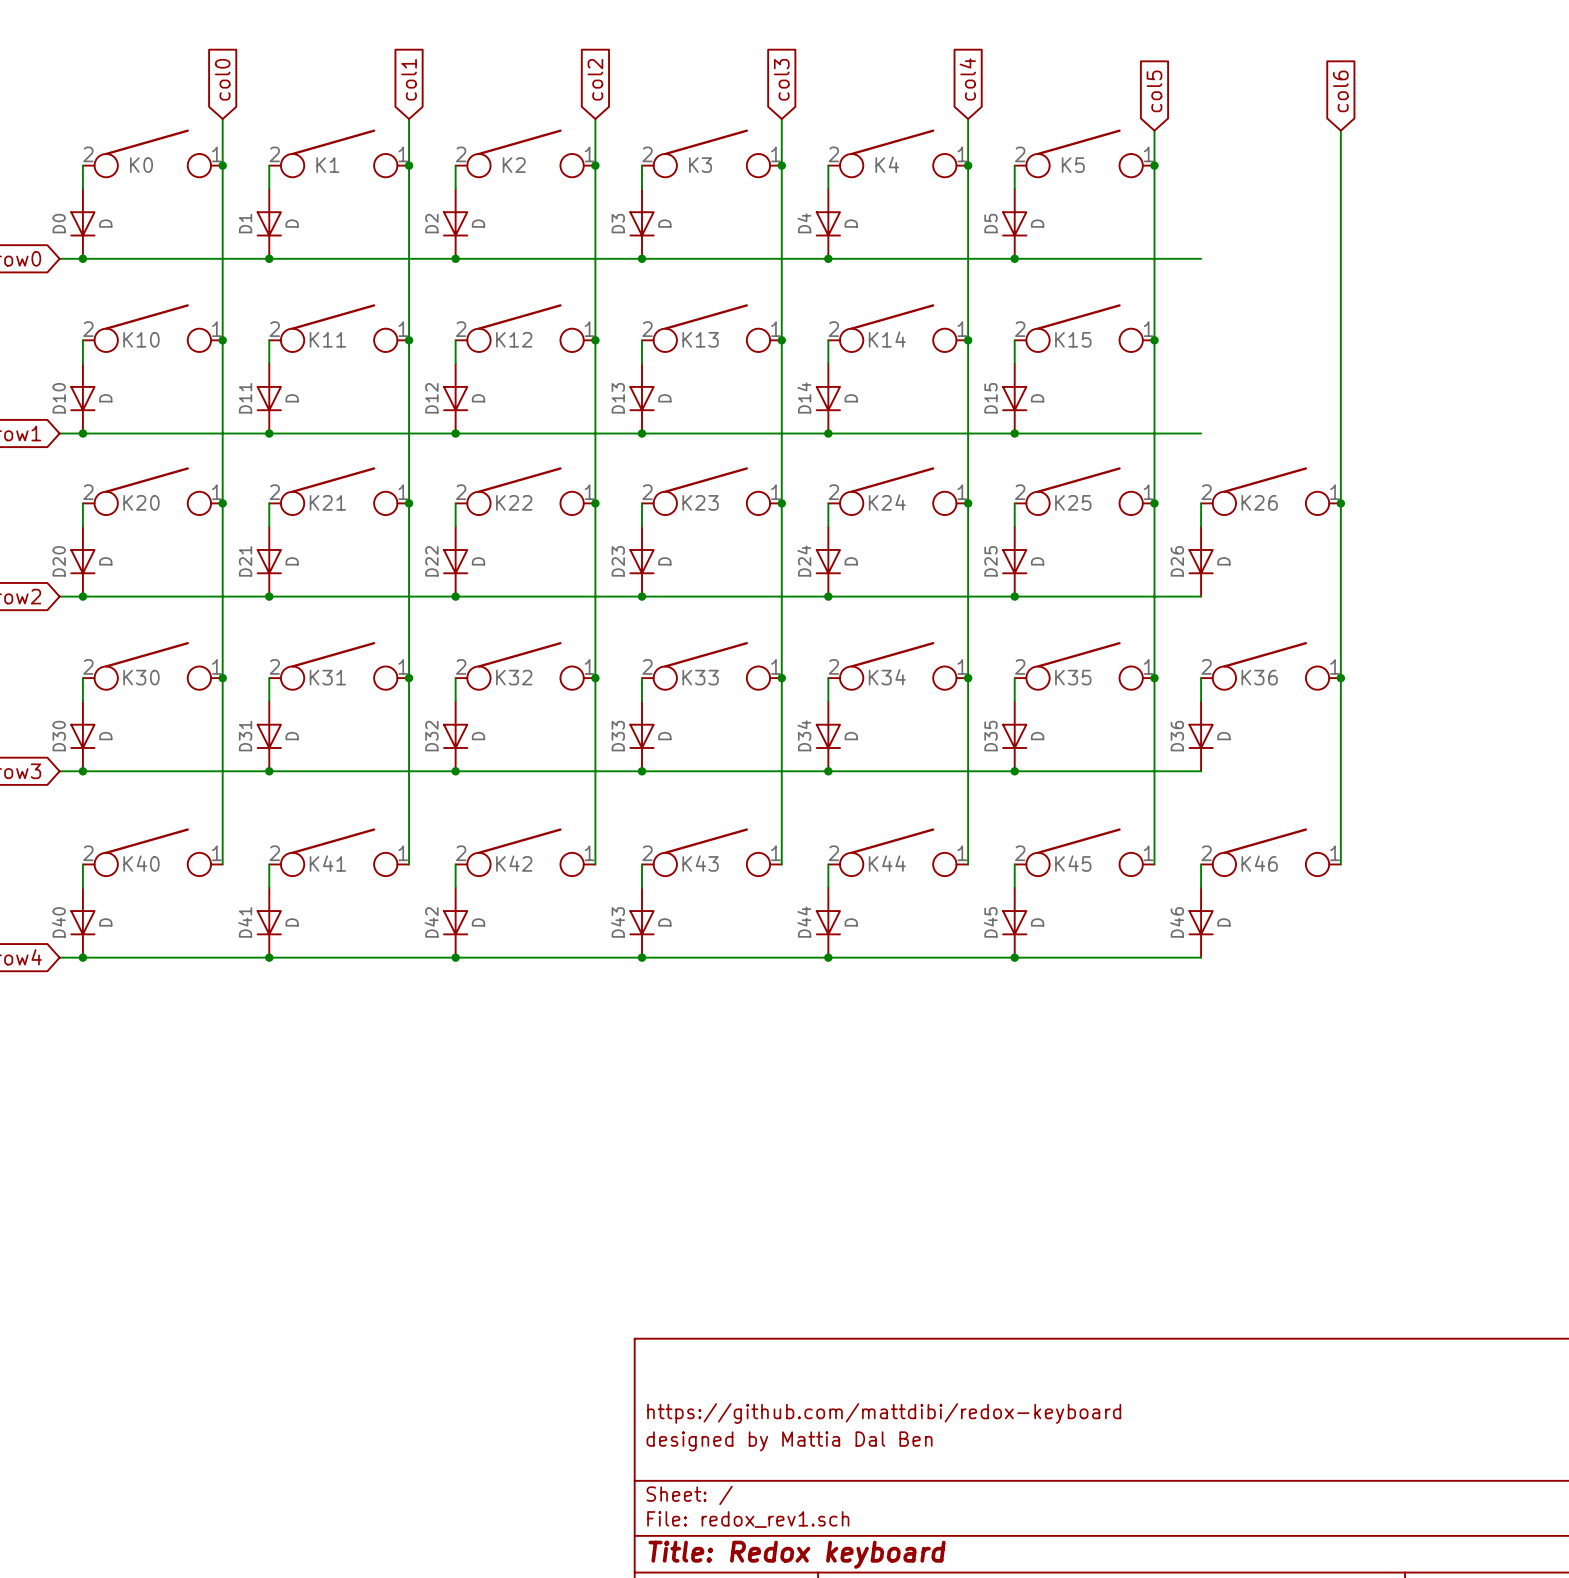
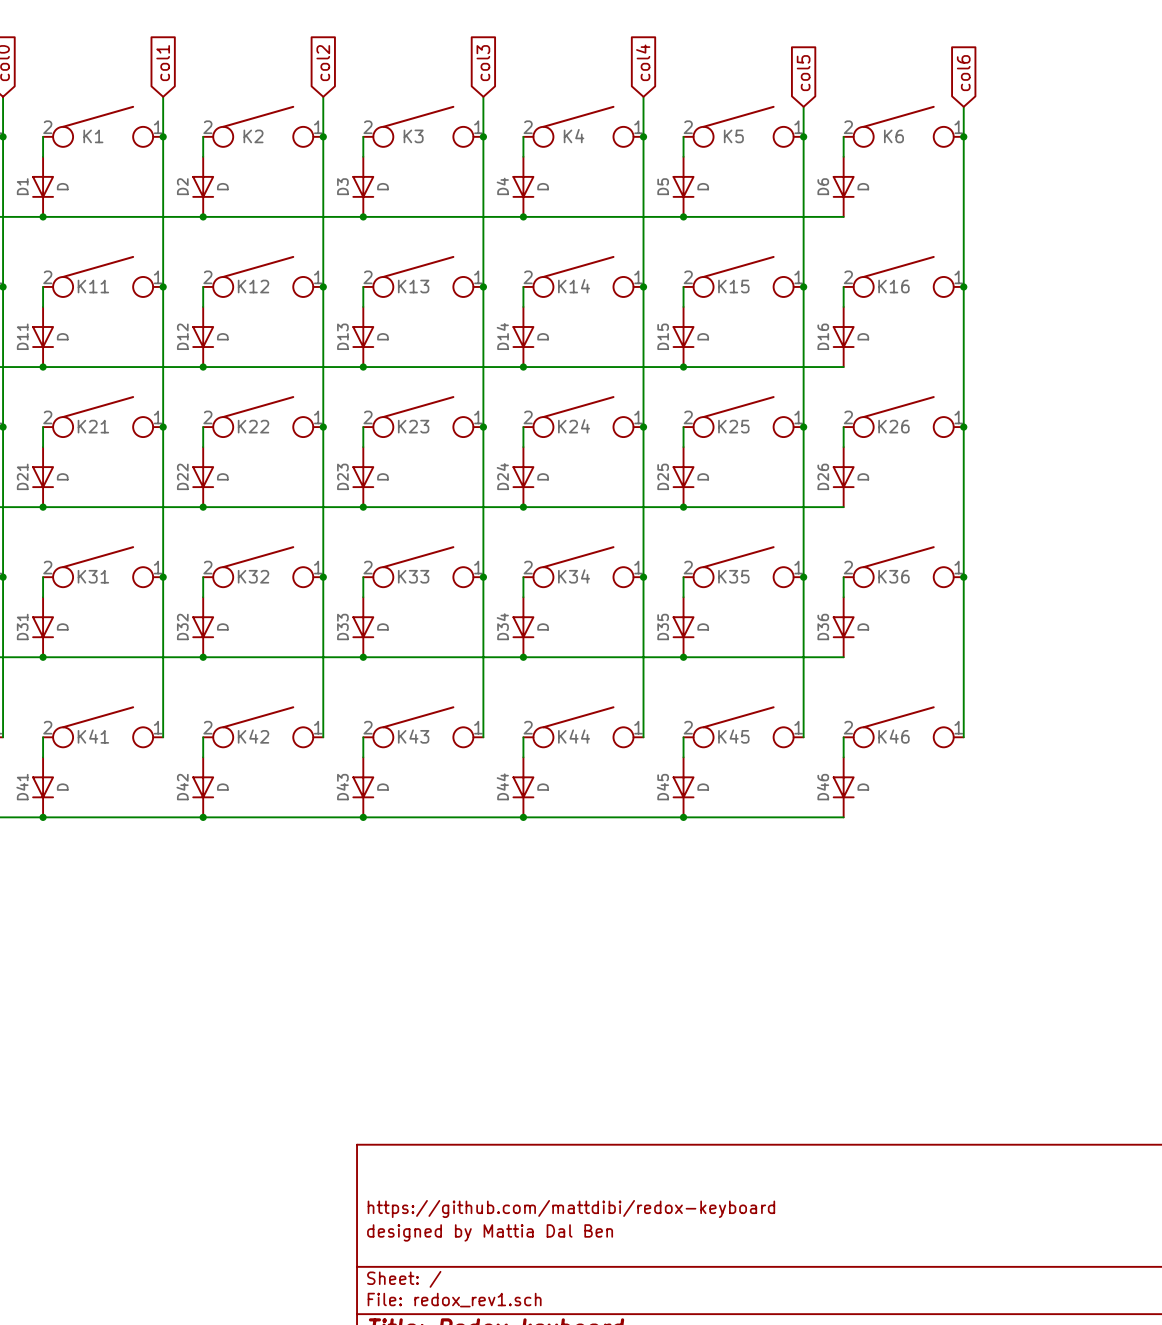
K6: none -> (903, 126)
wire: none -> (843, 136) (843, 156)
junction: none -> (963, 136)
D6: none -> D (843, 186)
K16: none -> (903, 276)
wire: none -> (843, 286) (843, 306)
junction: none -> (963, 286)
D16: none -> D (843, 337)

